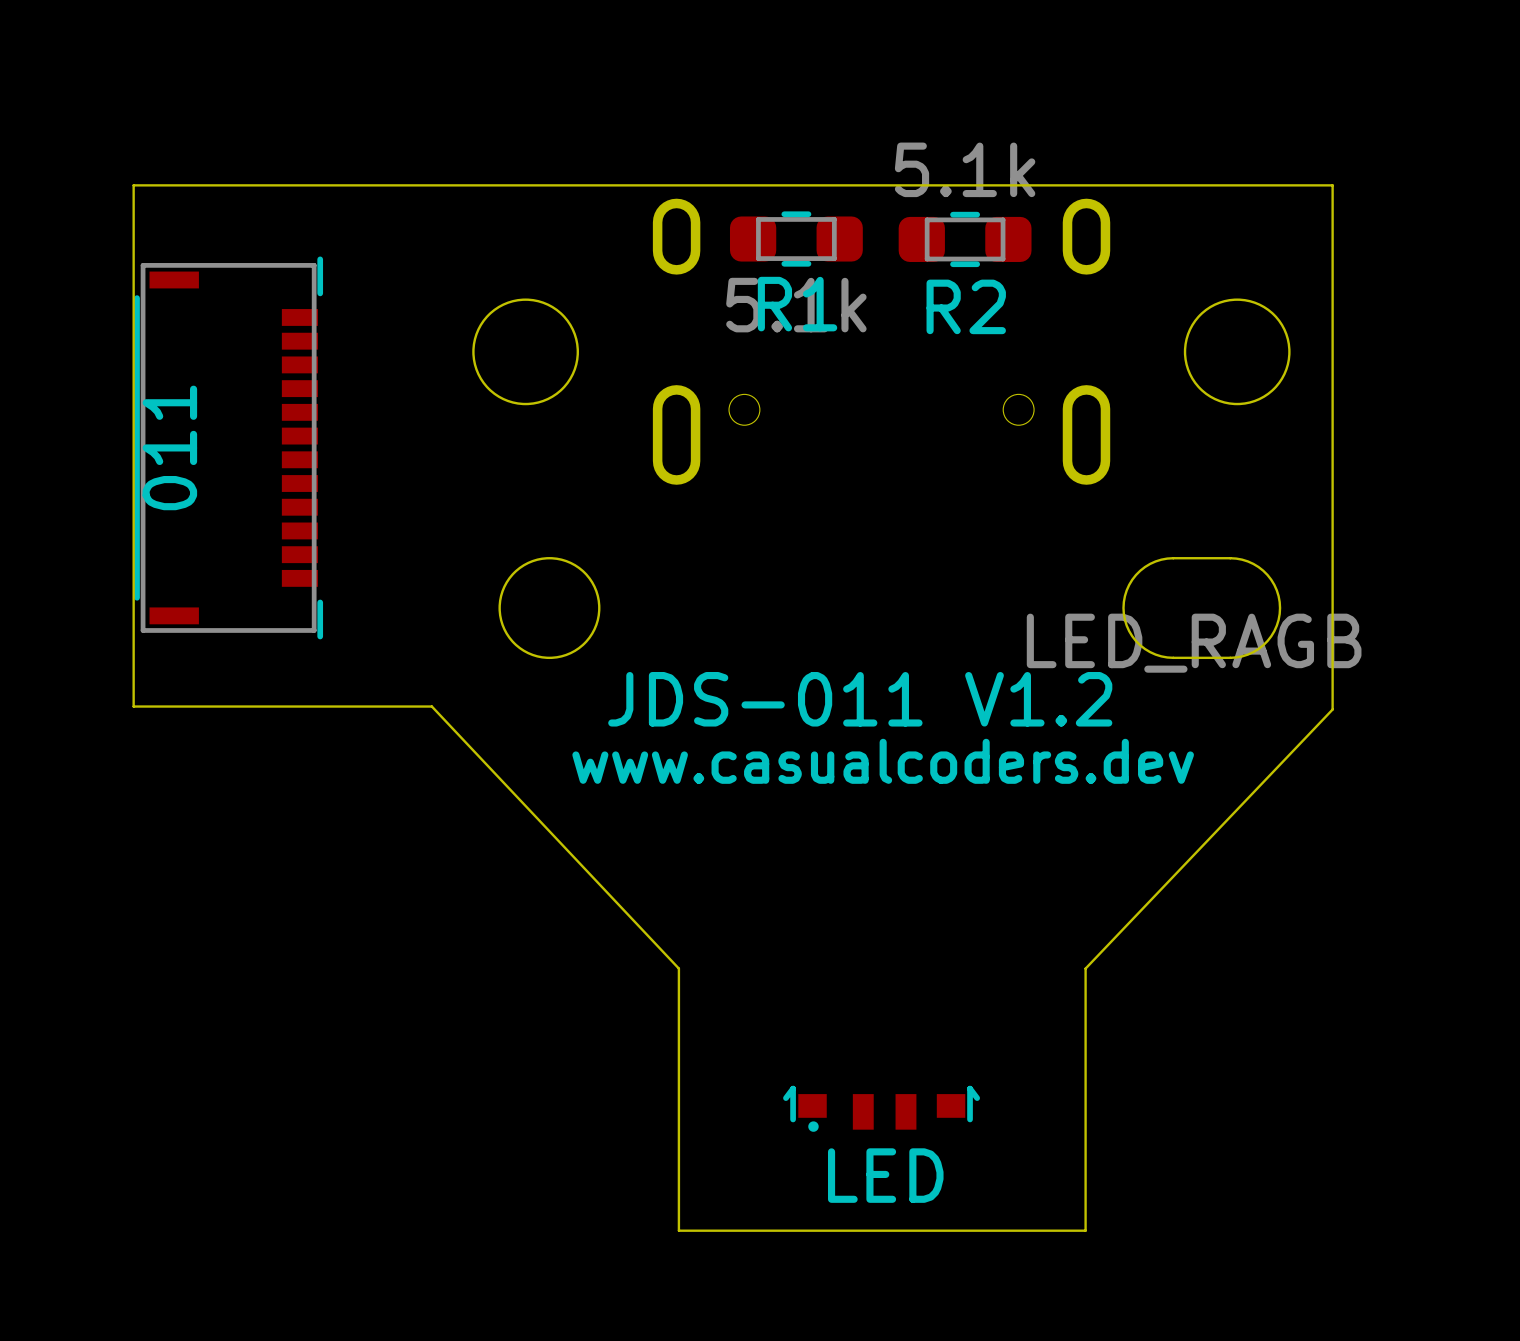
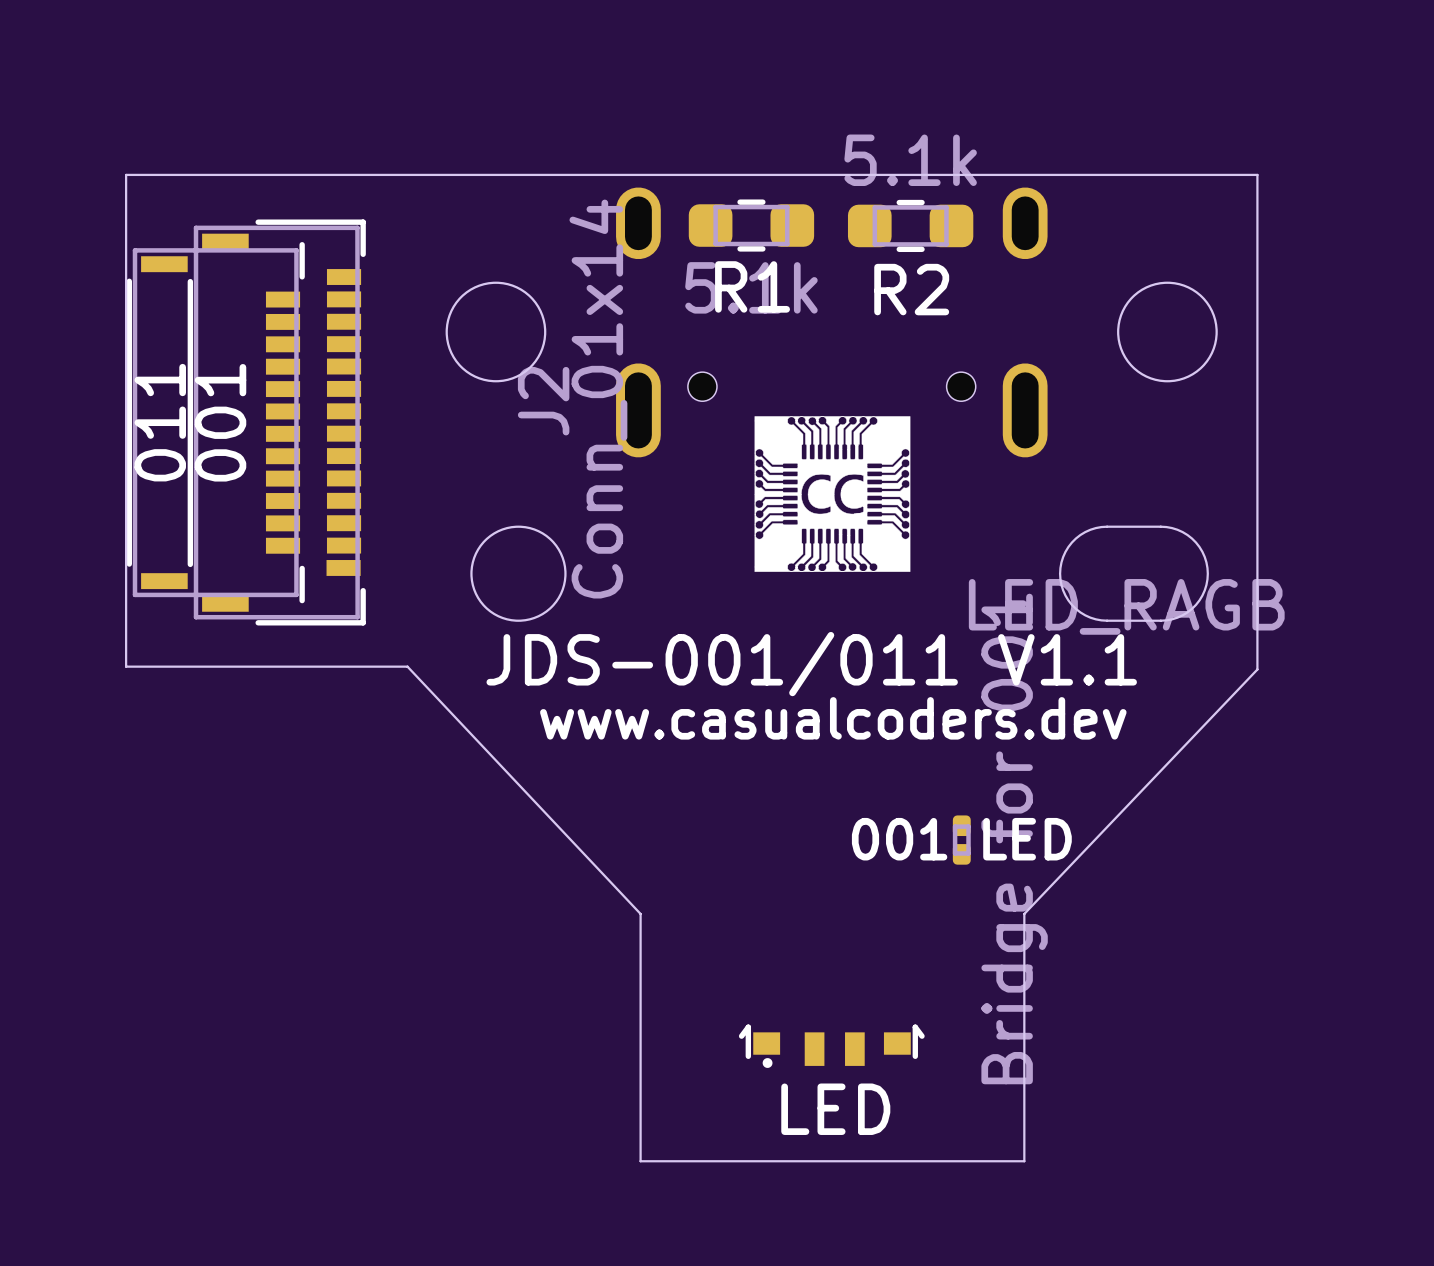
drawing: none -> [754, 416, 911, 572]
J2: none -> Conn_01x14 (276, 422)
text: JDS-011 V1.2 (860, 699) -> JDS-001/011 V1.1 (811, 664)
001 LED: none -> Bridge for 001 (961, 840)

